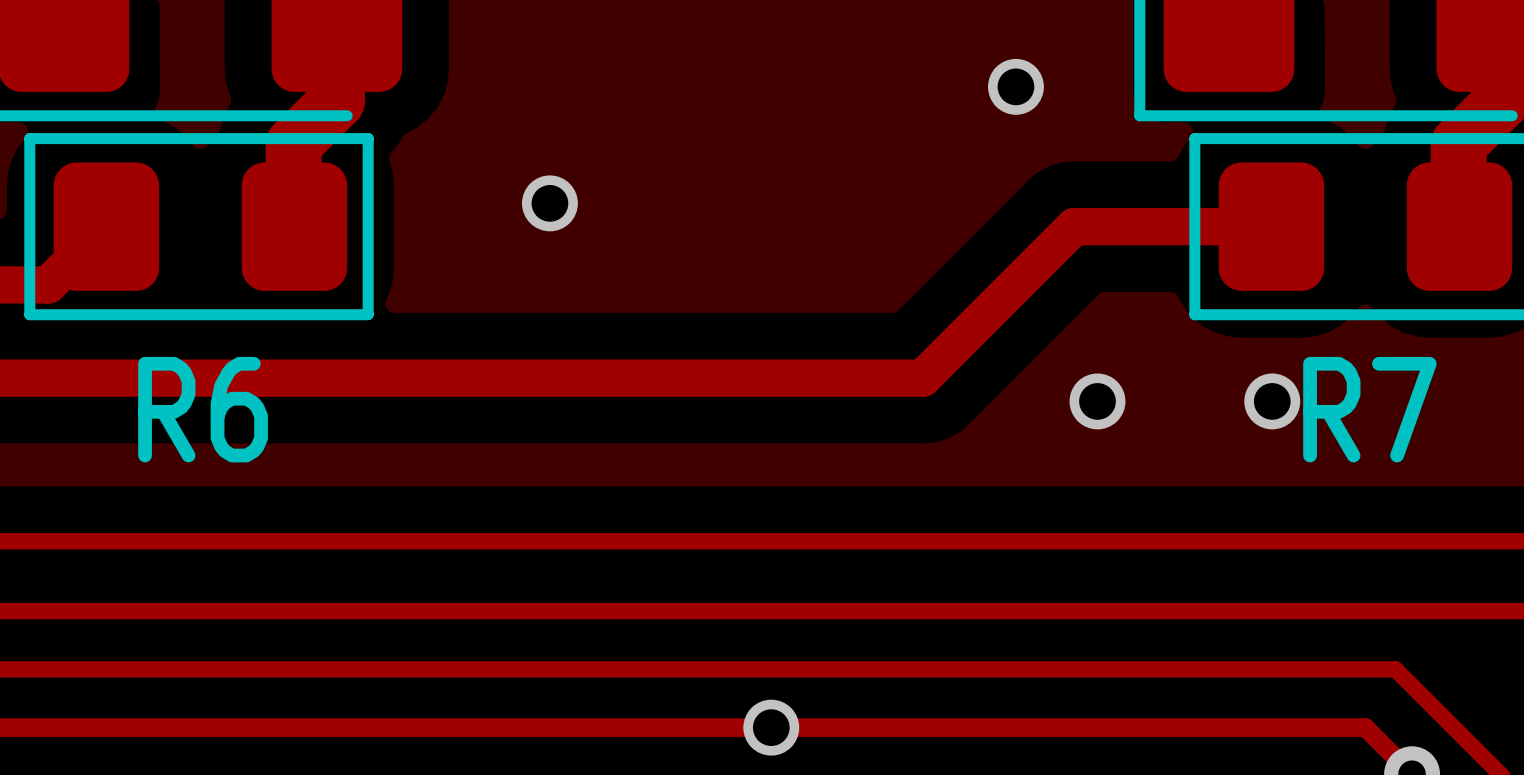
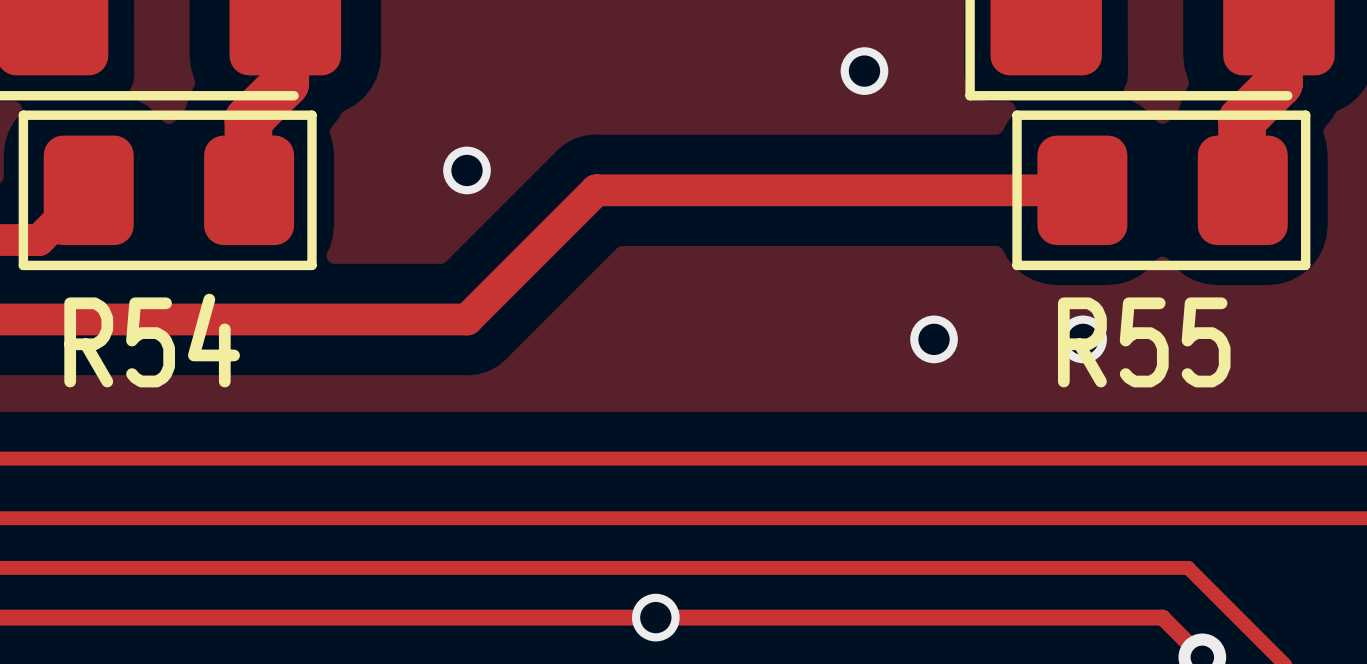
track: (1074, 226) (922, 378) (549, 378) -> (914, 190) (596, 190) (467, 319)
R6 name: R6 (203, 409) -> R54 (152, 340)
R7 name: R7 (1369, 409) -> R55 (1144, 342)

